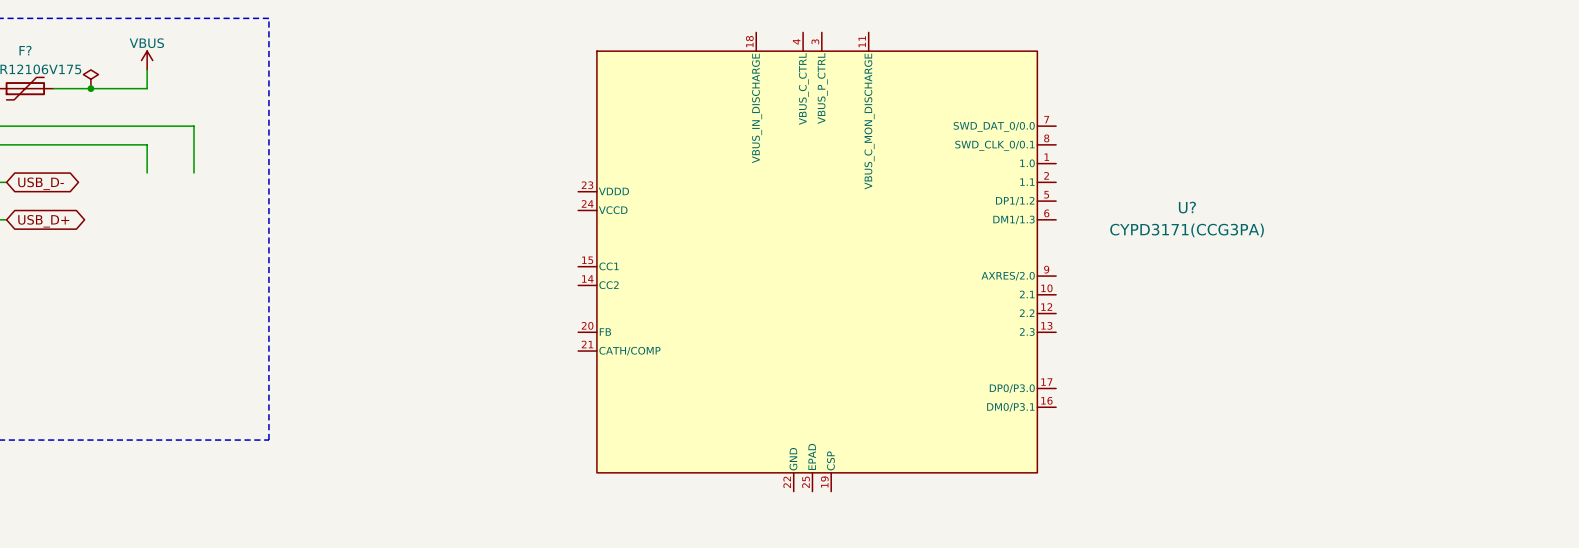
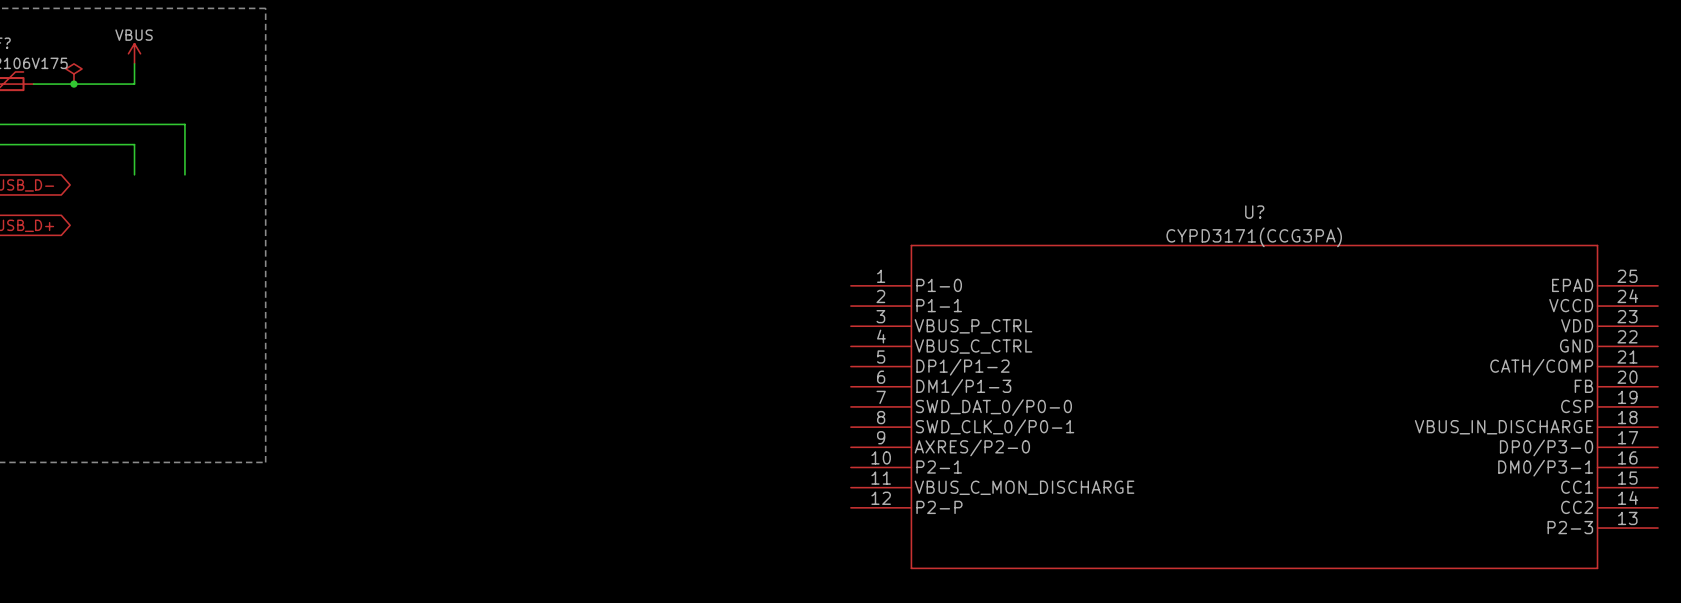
U?: CYPD3171(CCG3PA) (817, 262) -> none
U?: none -> CYPD3171(CCG3PA) (1254, 406)

